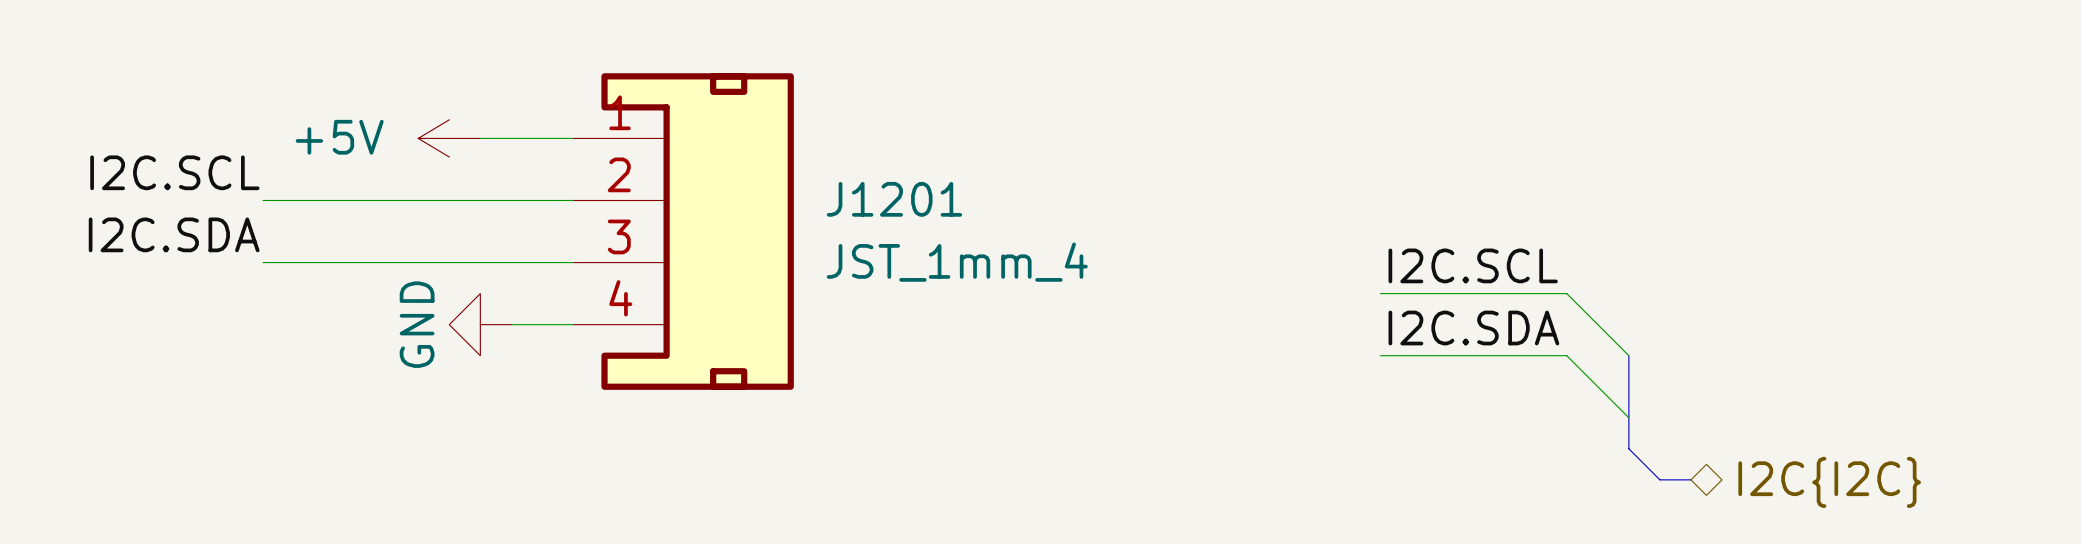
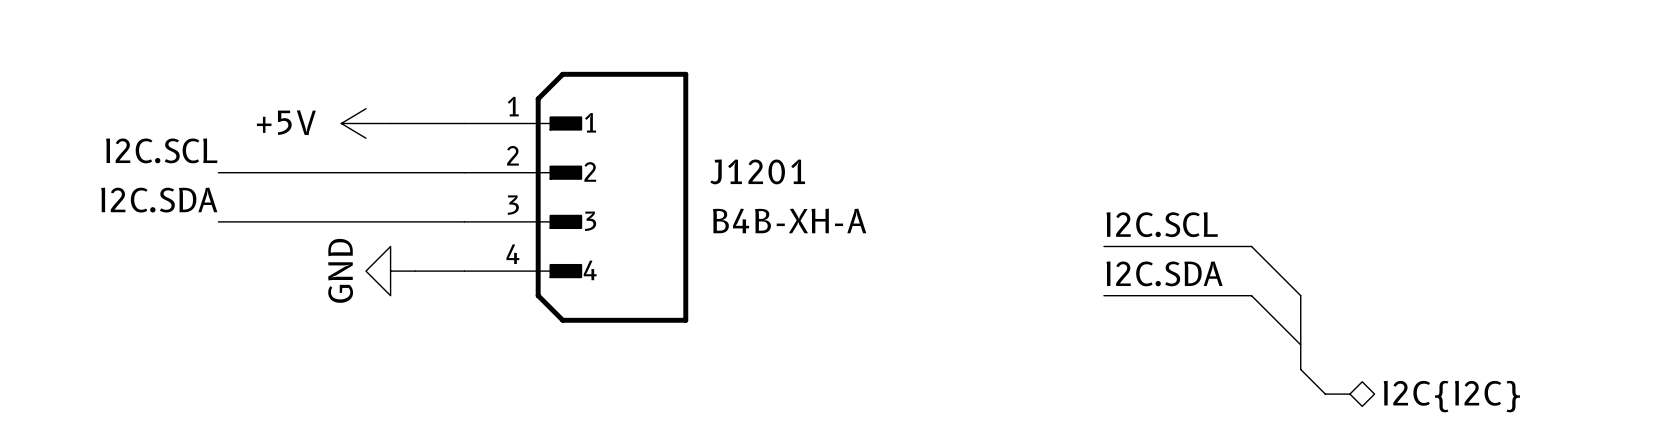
J1201 symbol: [573, 73, 794, 390] -> [464, 71, 689, 323]
J1201 value: JST_1mm_4 (957, 262) -> B4B-XH-A (789, 220)

